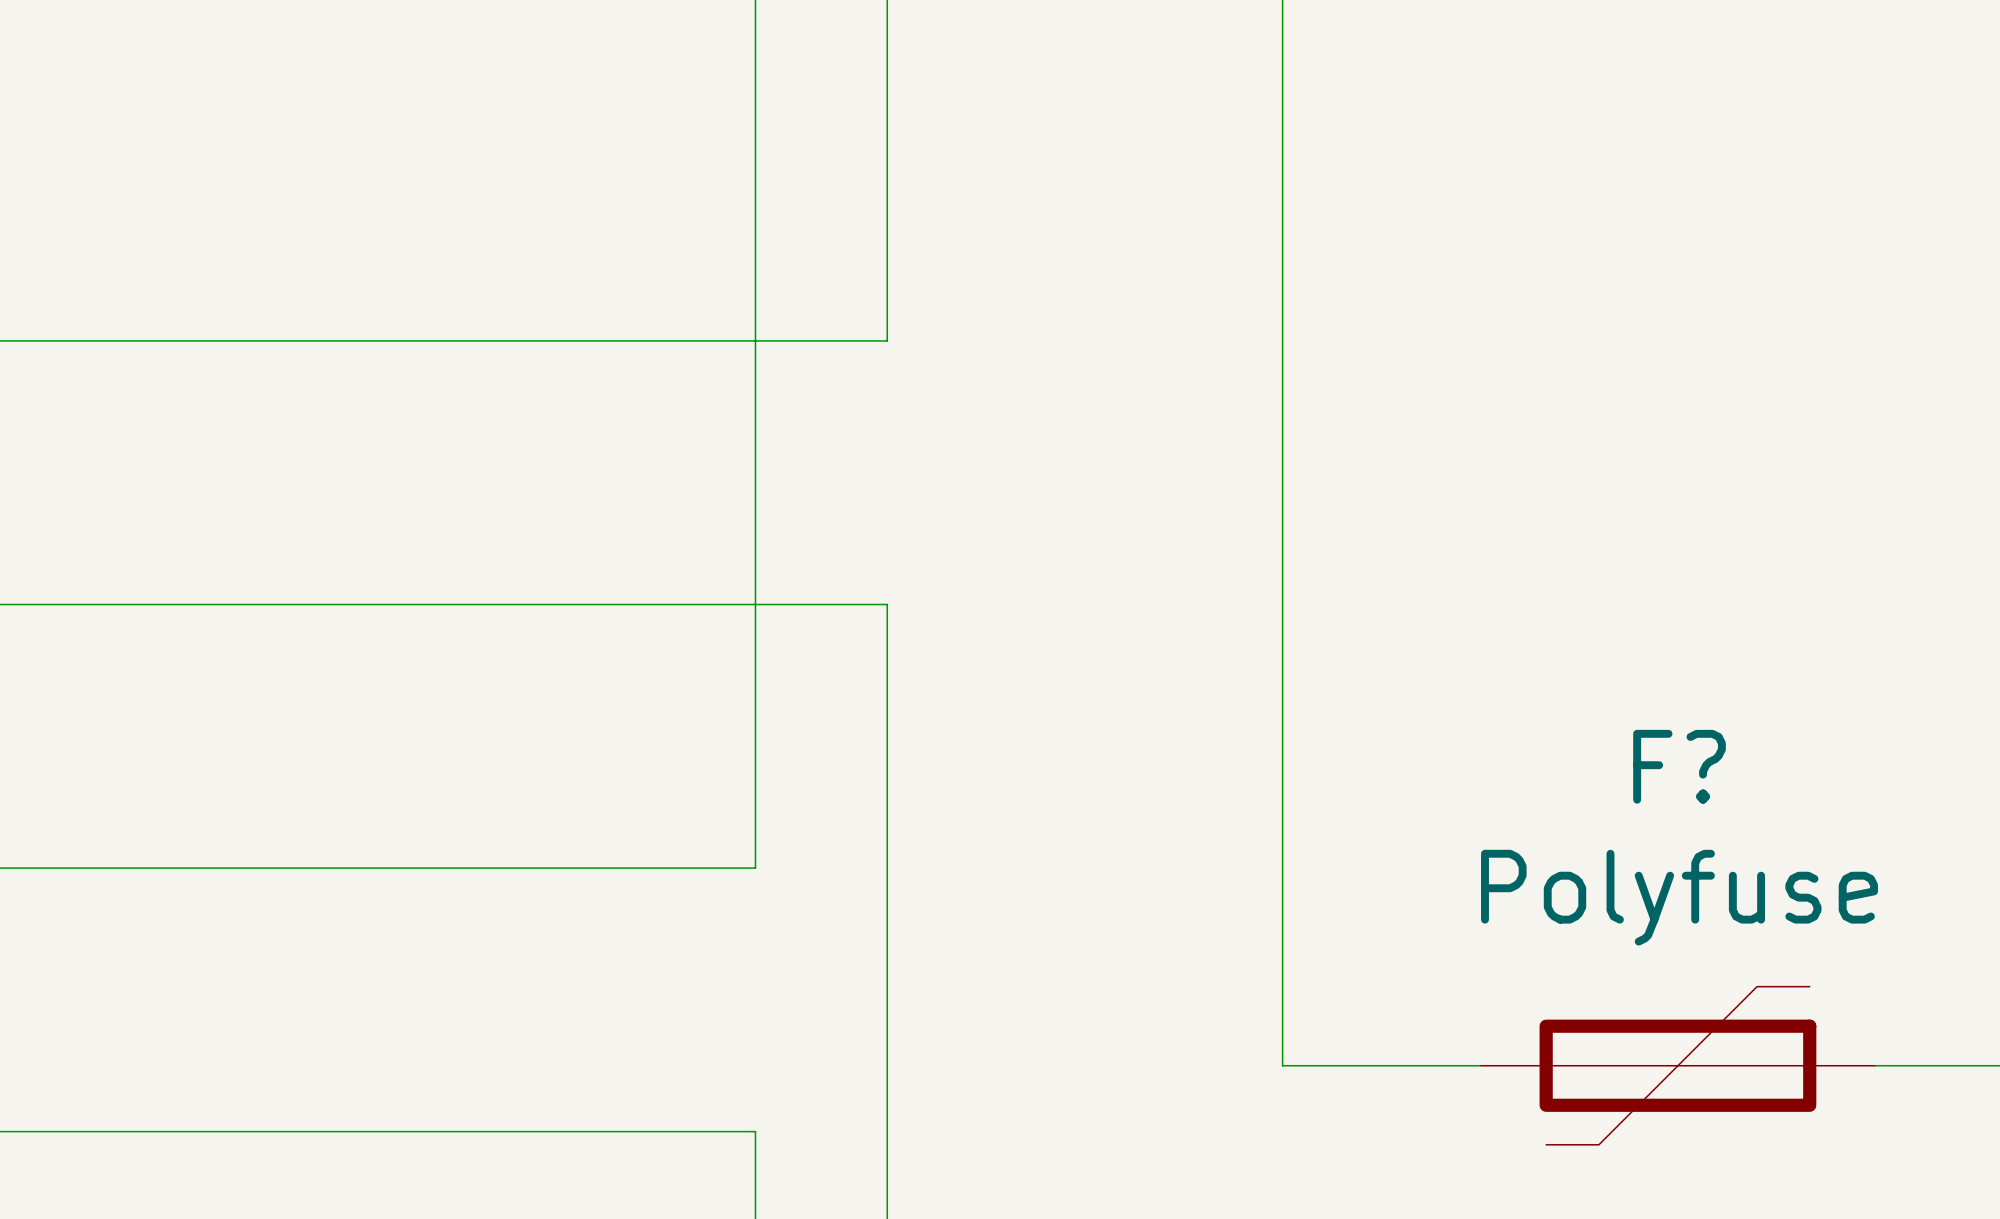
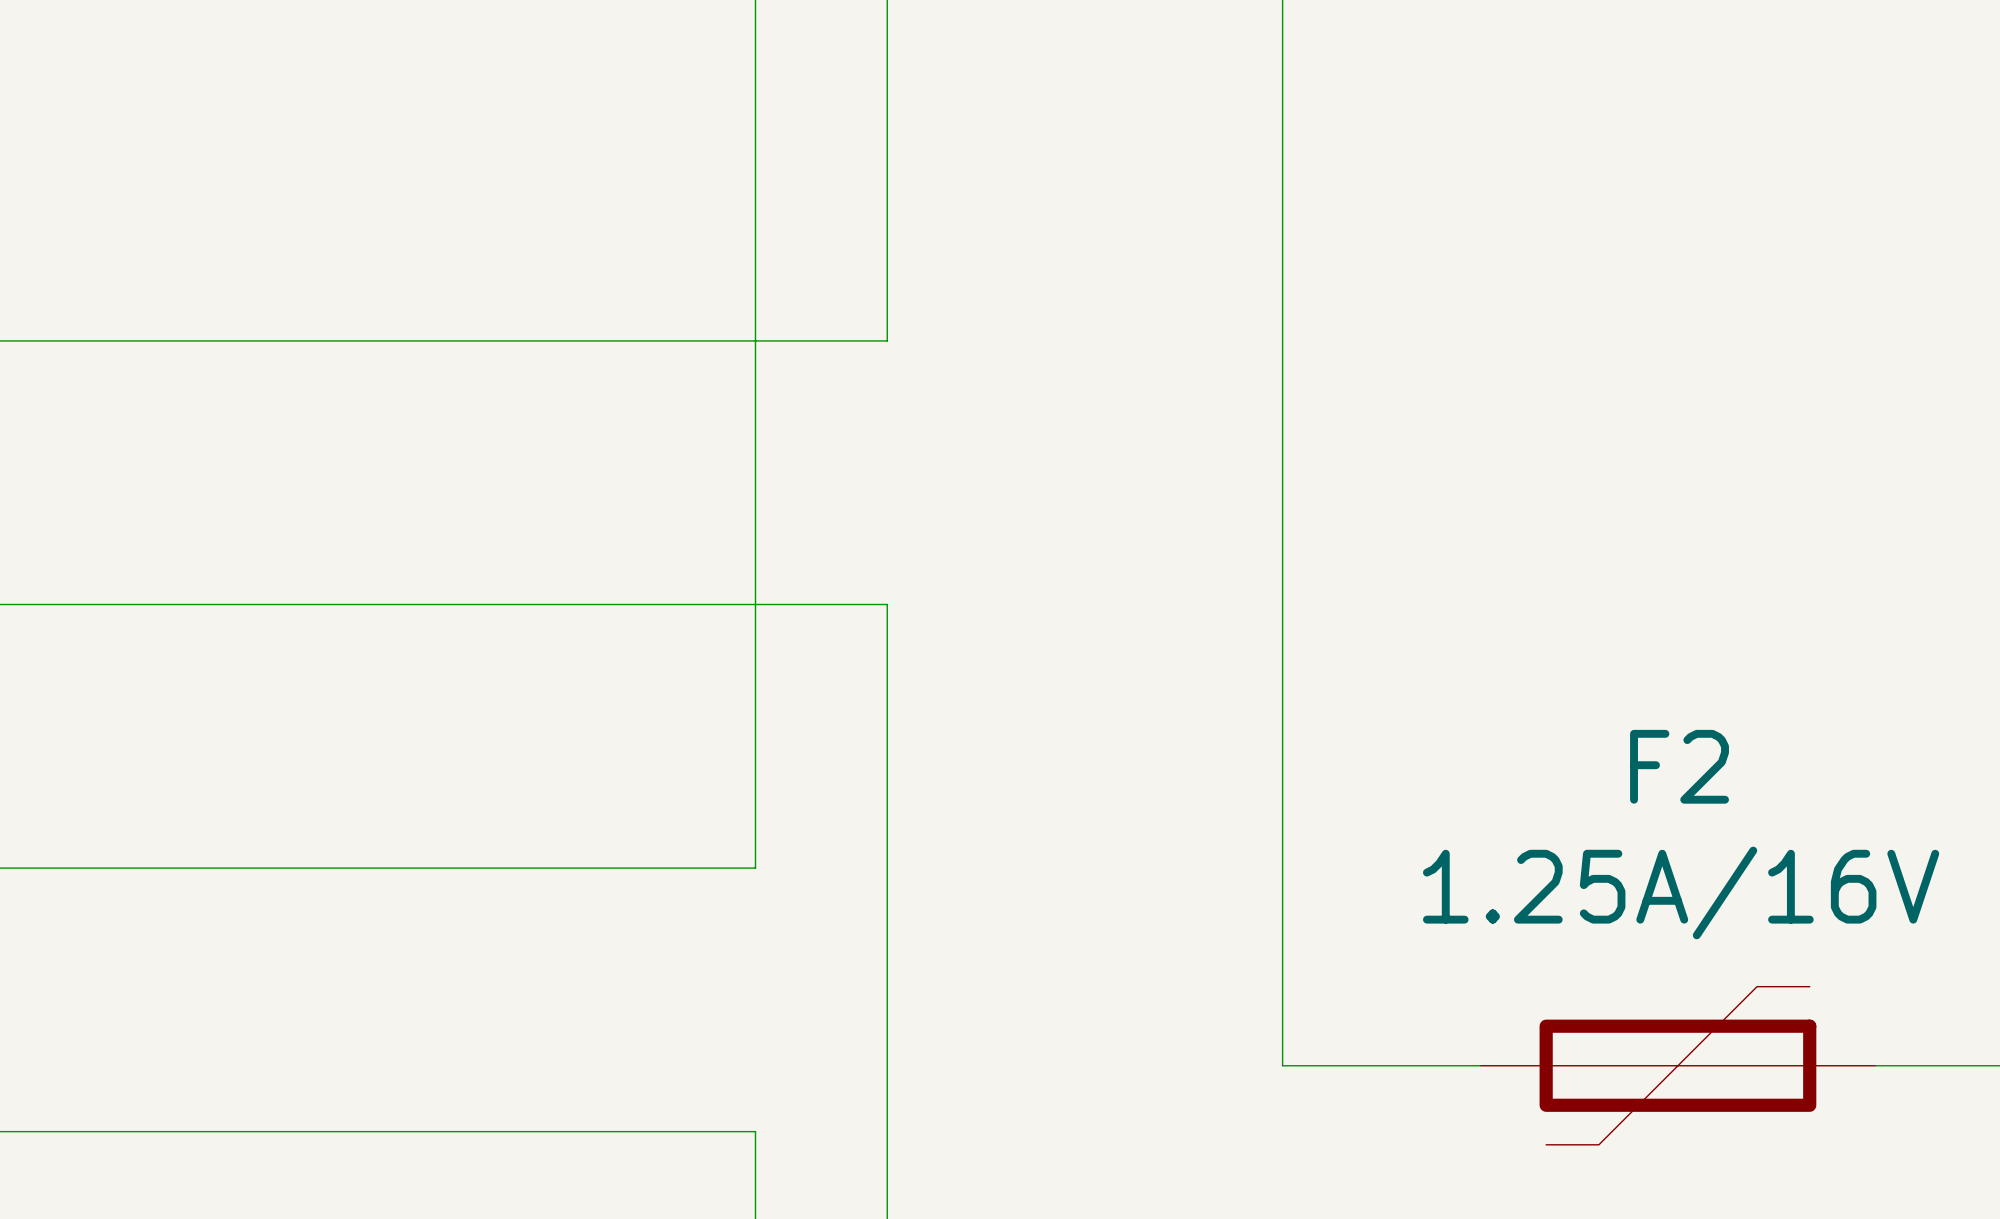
F? name: F? (1679, 766) -> F2 (1679, 766)
F? value: Polyfuse (1679, 897) -> 1.25A/16V (1681, 892)

